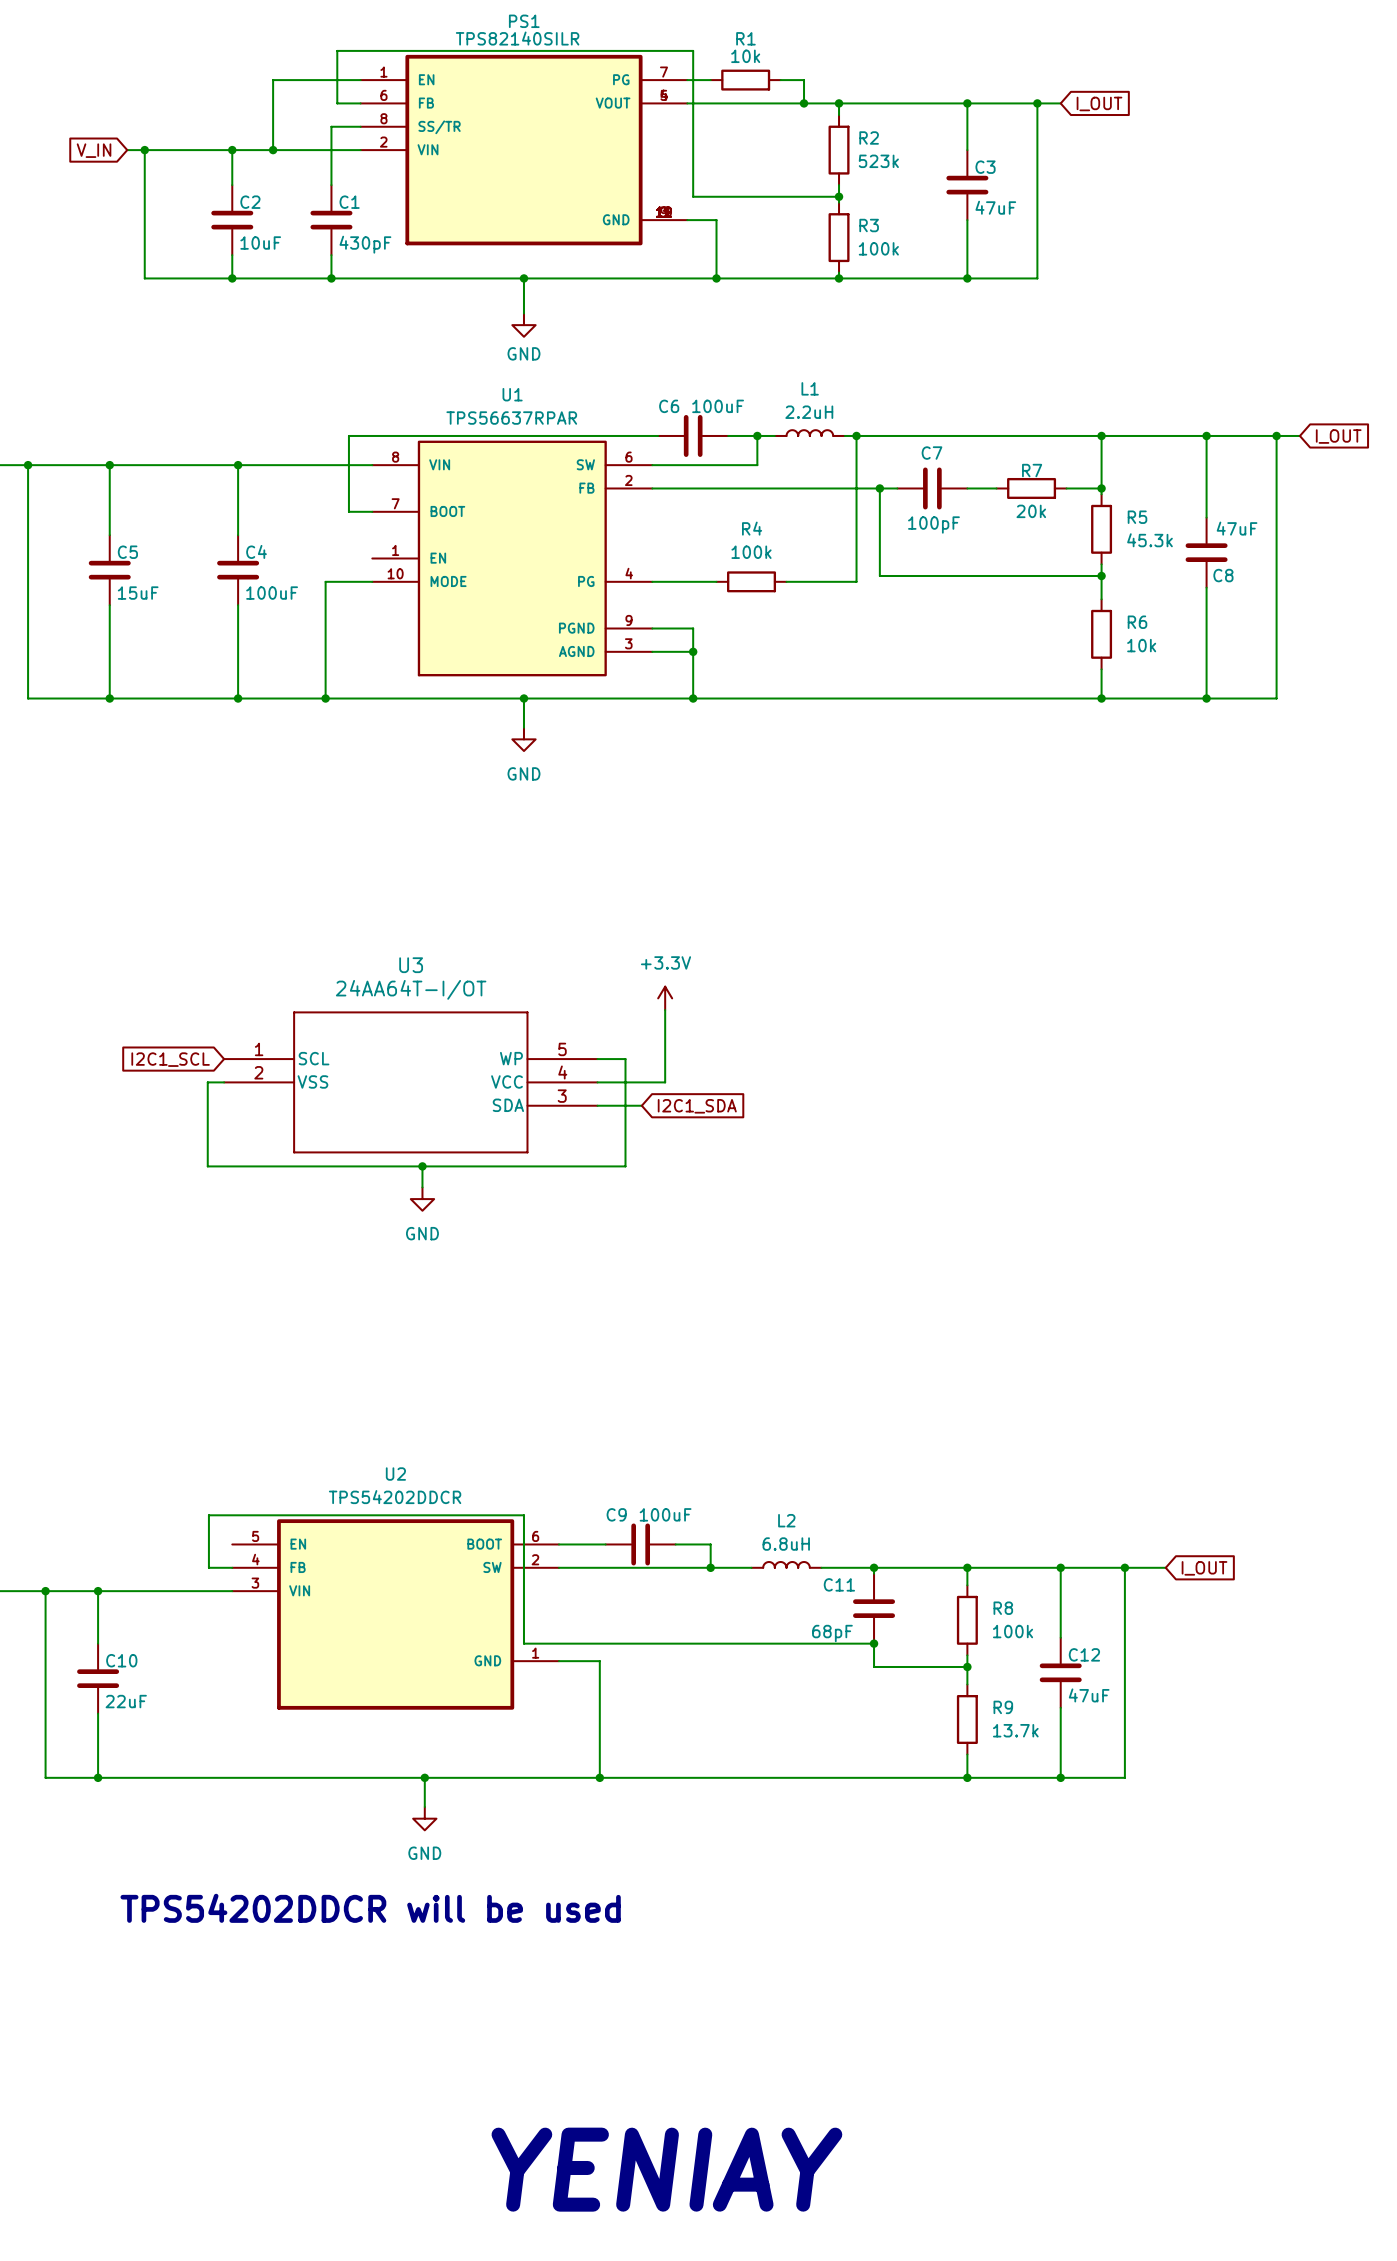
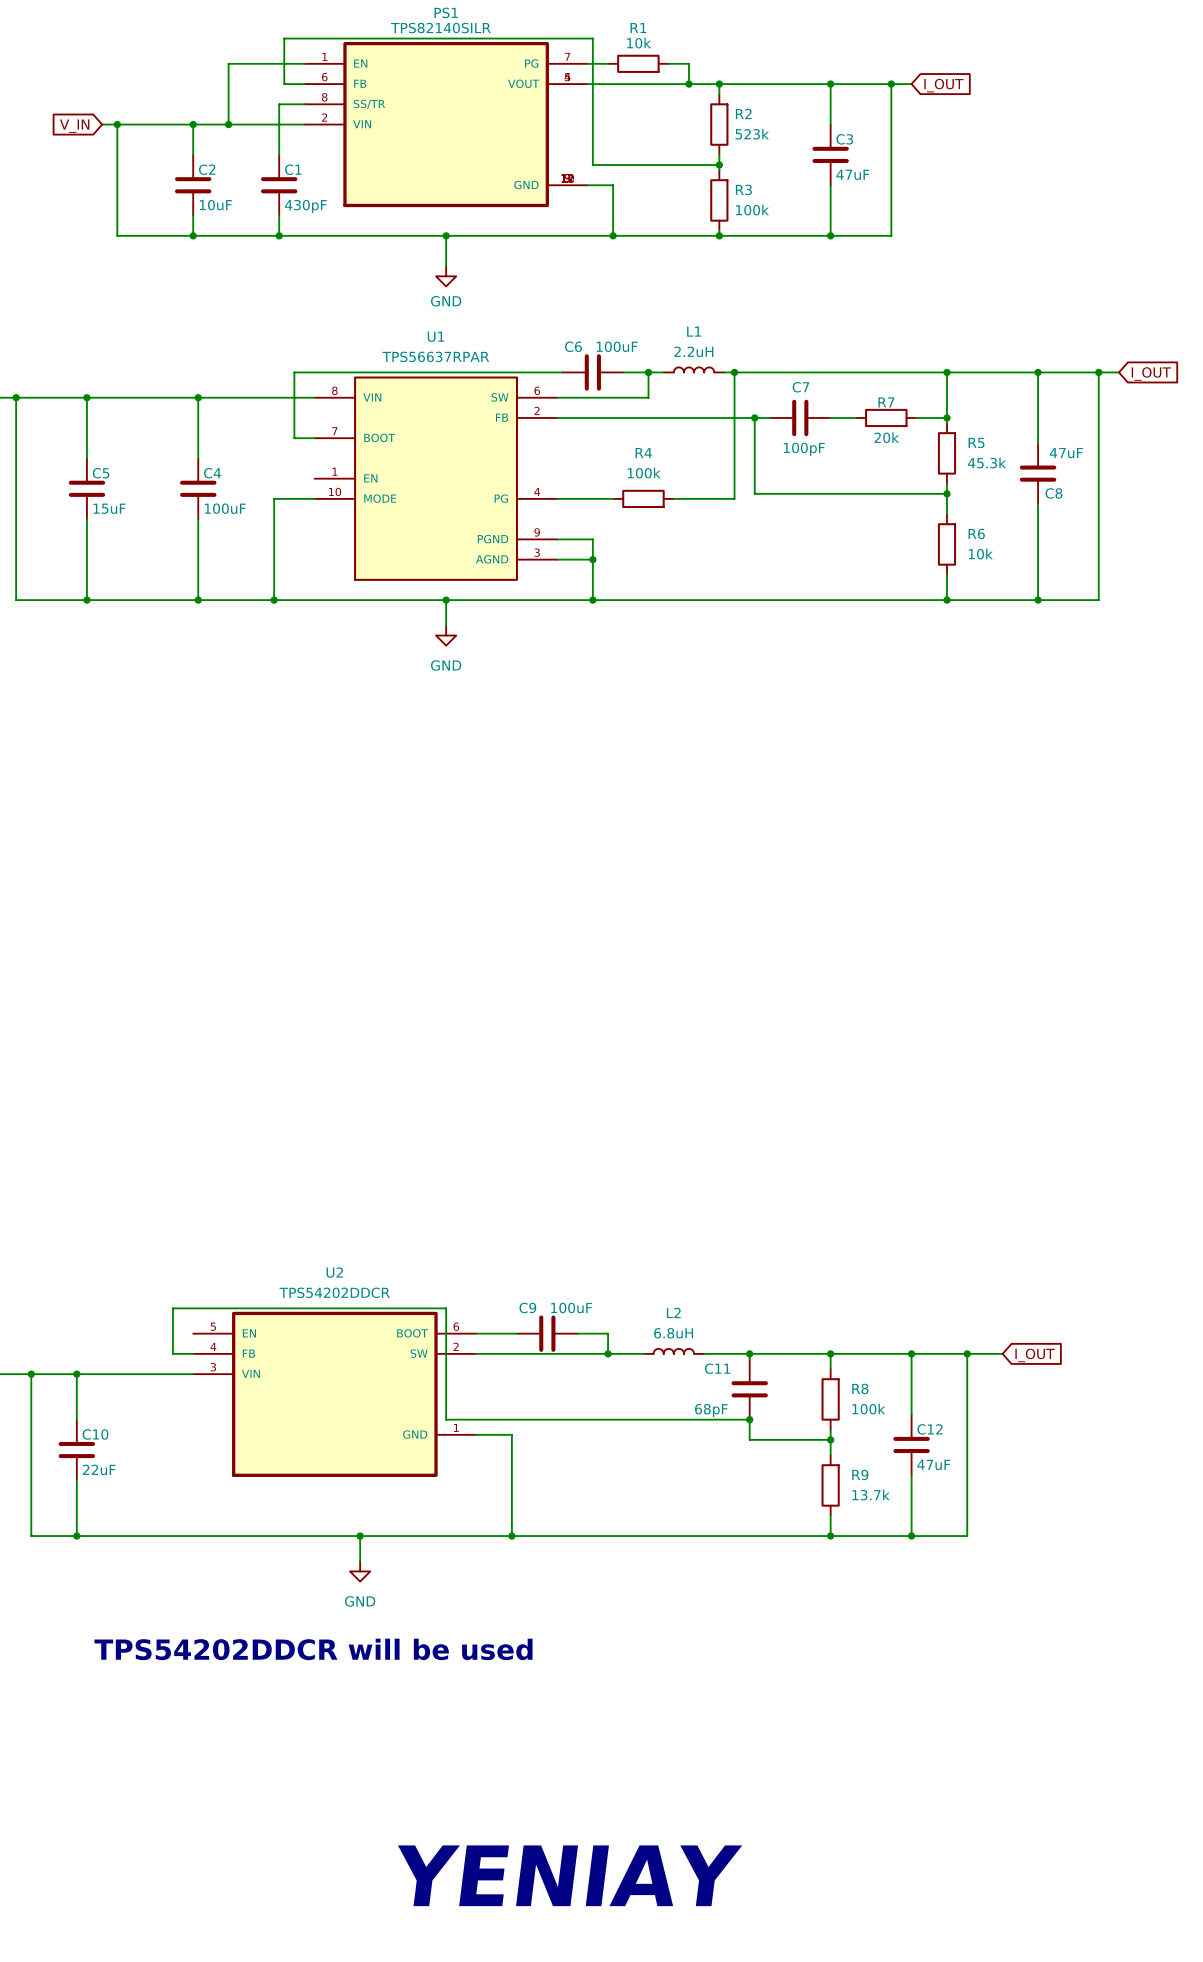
power symbol: +3.3V (665, 998) -> none
wire: (665, 1010) (665, 1082) (597, 1082) -> none
global label: I2C1_SCL (170, 1059) -> none
wire: (597, 1059) (625, 1059) (625, 1166) (207, 1166) (207, 1082) (224, 1082) -> none
U3: 24AA64T-I/OT (410, 1082) -> none
wire: (597, 1105) (641, 1105) -> none
global label: I2C1_SDA (697, 1106) -> none
wire: (422, 1166) (422, 1187) -> none
junction: (422, 1166) -> none
power symbol: GND (422, 1199) -> none

